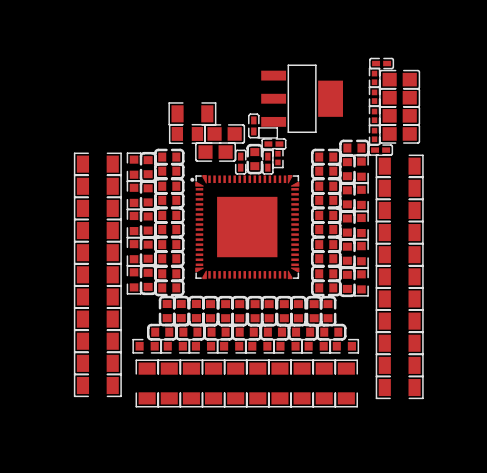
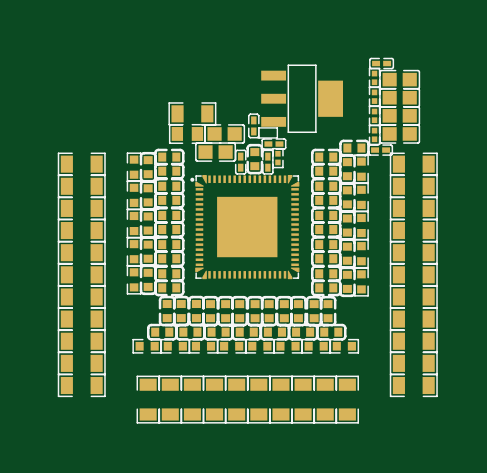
part: none -> (81, 164)
part: (97, 164) -> none
part: none -> (413, 164)
part: (399, 166) -> none
part: none -> (81, 186)
part: (97, 186) -> none
part: none -> (413, 186)
part: (399, 188) -> none
part: none -> (81, 208)
part: (97, 208) -> none
part: none -> (413, 208)
part: (399, 210) -> none
part: none -> (81, 230)
part: (97, 230) -> none
part: none -> (413, 230)
part: (399, 232) -> none
part: none -> (81, 252)
part: (97, 252) -> none
part: none -> (413, 252)
part: (399, 254) -> none
part: none -> (81, 274)
part: (97, 274) -> none
part: none -> (413, 274)
part: (399, 276) -> none
part: none -> (81, 296)
part: (97, 296) -> none
part: none -> (413, 296)
part: (399, 298) -> none
part: none -> (81, 319)
part: (97, 319) -> none
part: none -> (413, 319)
part: (399, 321) -> none
part: none -> (81, 341)
part: (97, 341) -> none
part: none -> (413, 341)
part: (399, 343) -> none
part: none -> (81, 363)
part: (97, 363) -> none
part: none -> (413, 363)
part: (399, 365) -> none
part: (147, 383) -> none
part: (169, 383) -> none
part: (191, 383) -> none
part: (213, 383) -> none
part: (235, 383) -> none
part: (257, 383) -> none
part: (279, 383) -> none
part: (302, 383) -> none
part: (324, 383) -> none
part: (346, 383) -> none
part: none -> (81, 385)
part: (97, 385) -> none
part: none -> (413, 385)
part: (399, 387) -> none
part: none -> (148, 399)
part: none -> (170, 399)
part: none -> (192, 399)
part: none -> (214, 399)
part: none -> (236, 399)
part: none -> (258, 399)
part: none -> (280, 399)
part: none -> (303, 399)
part: none -> (325, 399)
part: none -> (347, 399)

